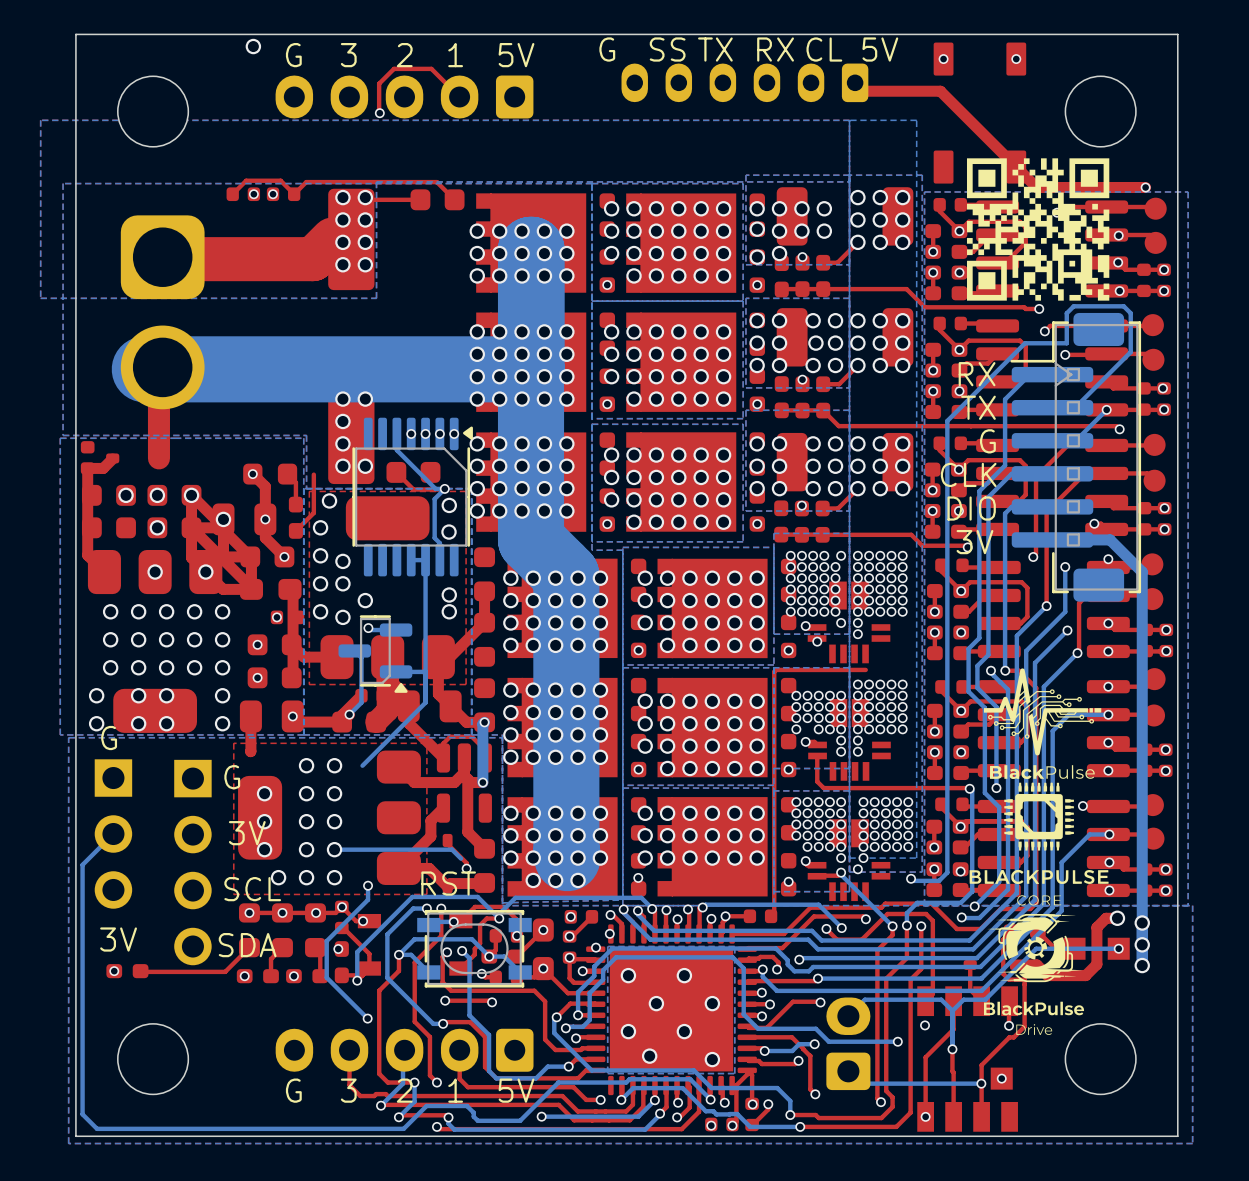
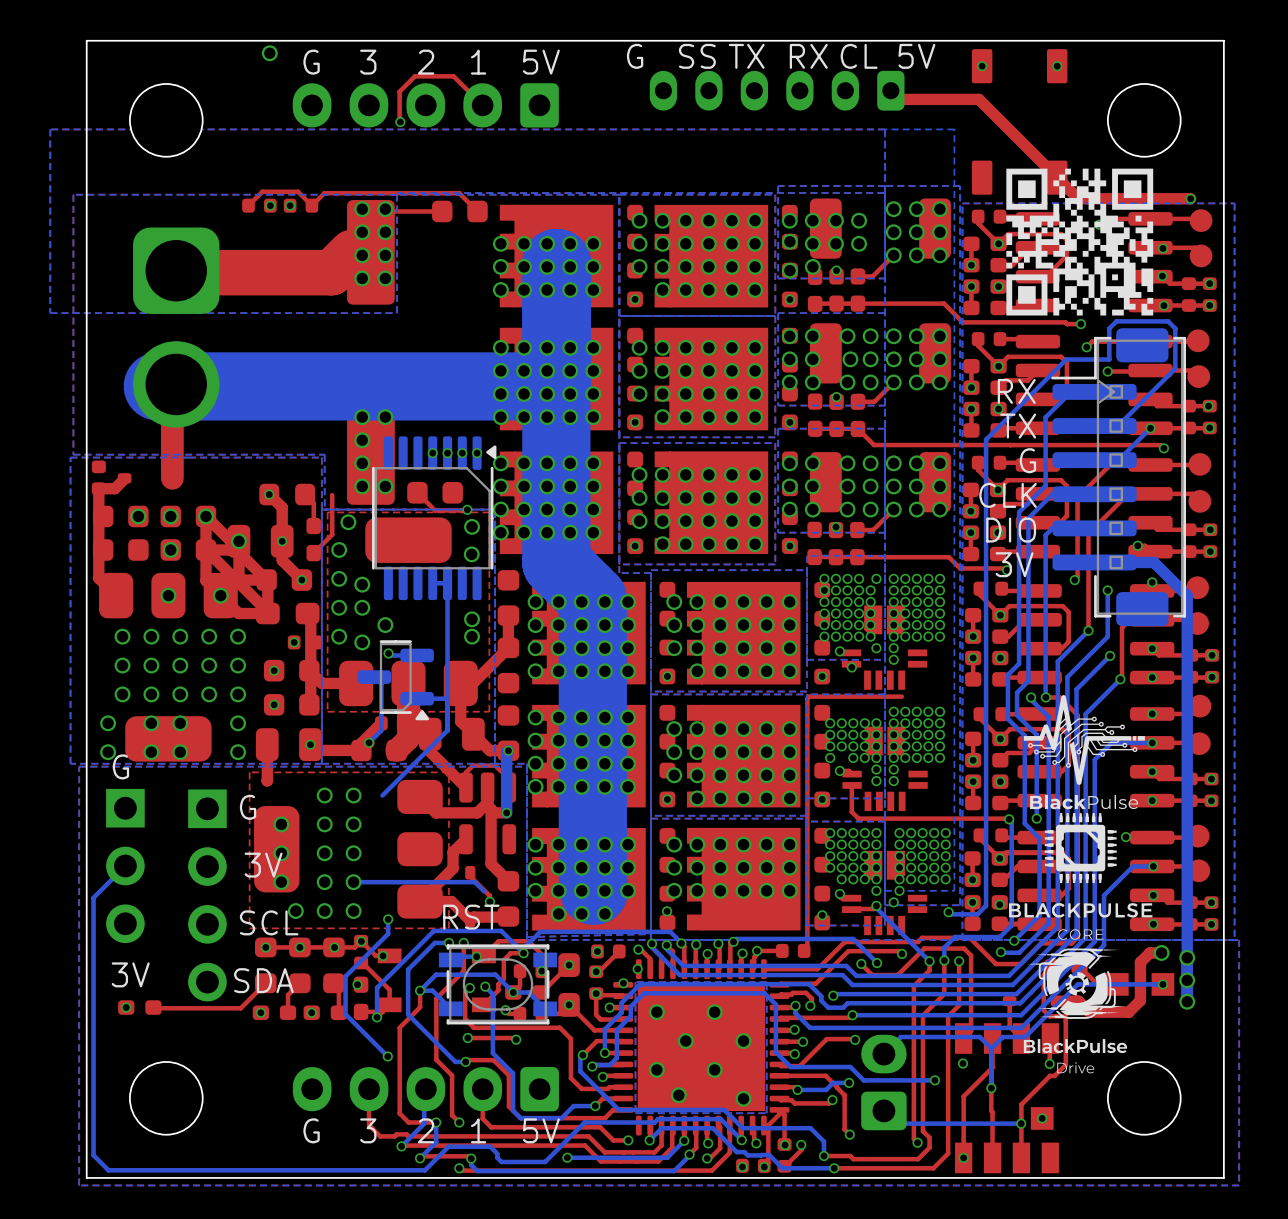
bottom track: (396, 433) (396, 450) (435, 488) (444, 488) (434, 499) (434, 538) (439, 543) (439, 560) -> none

